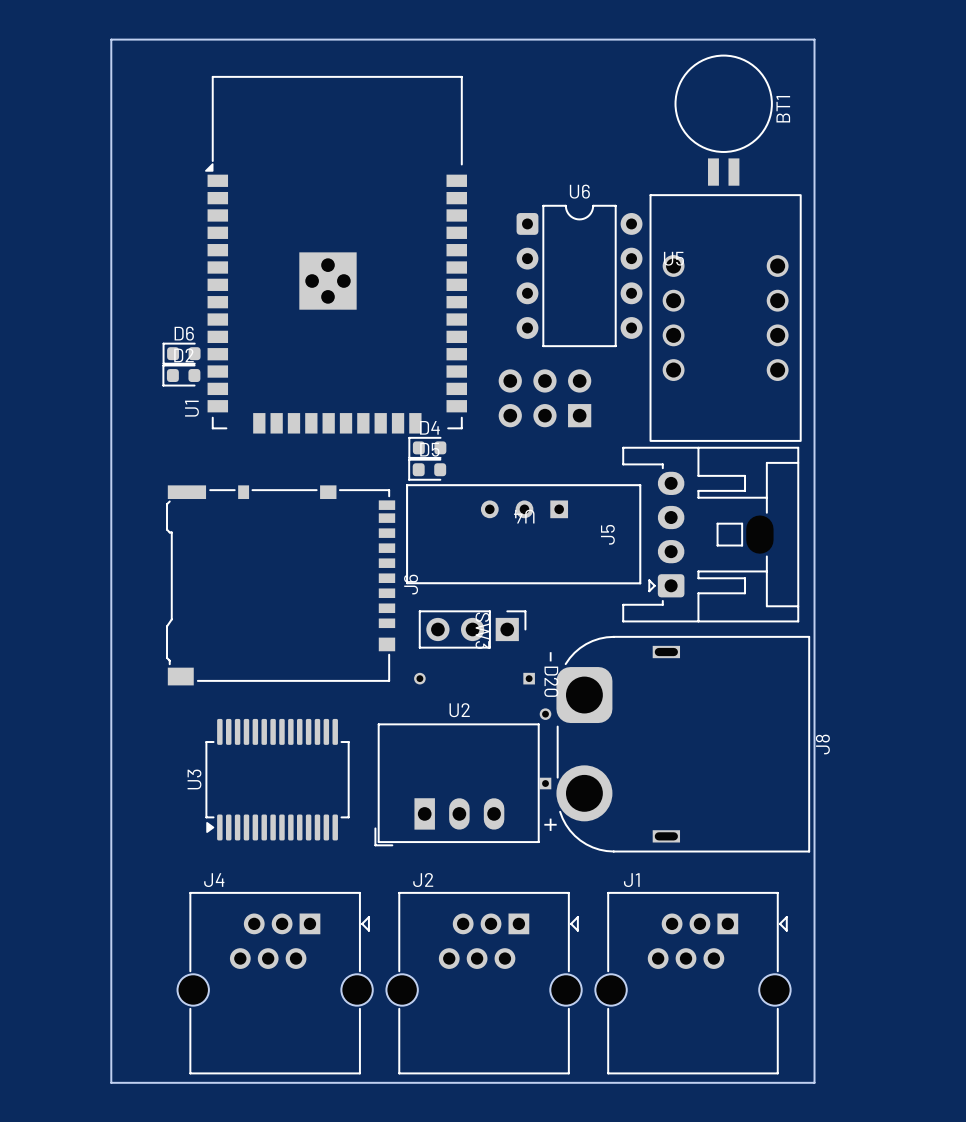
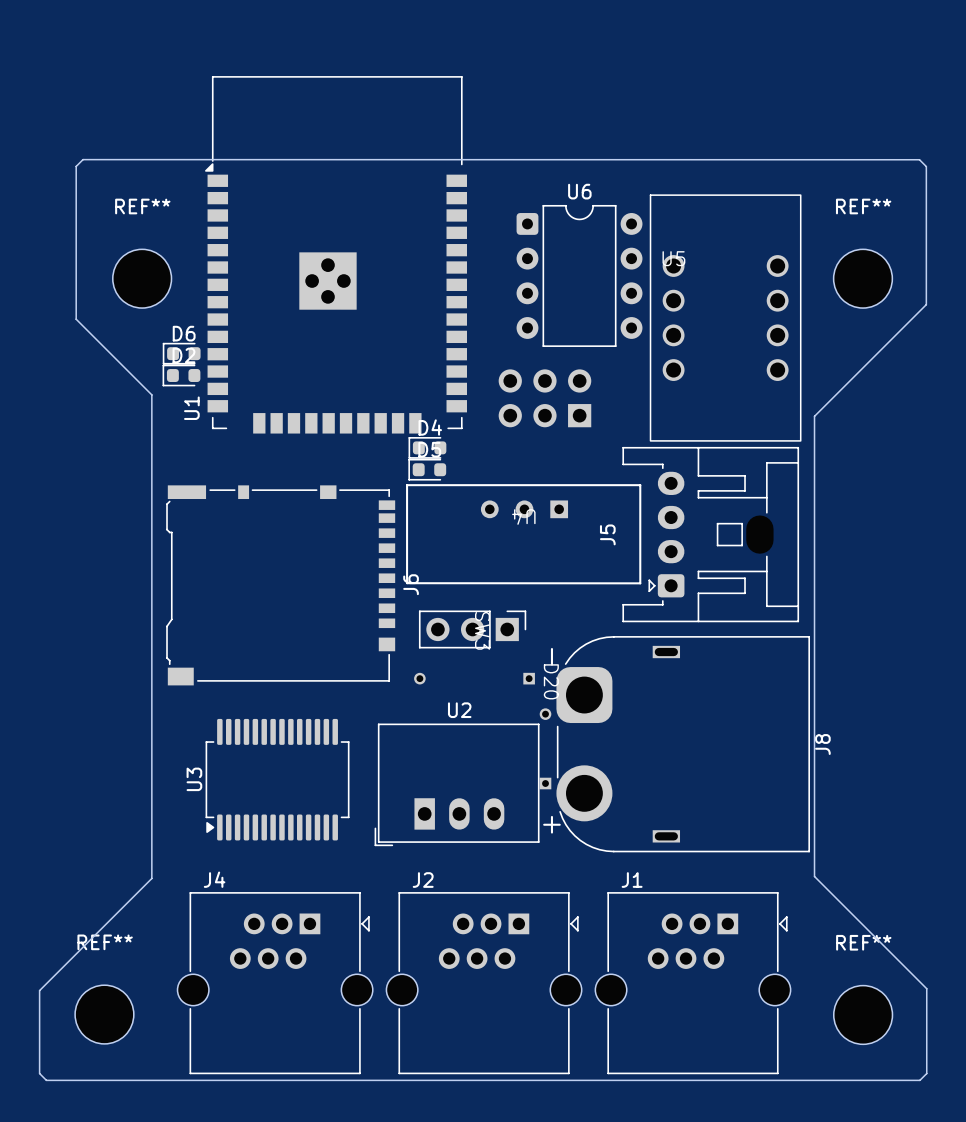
BT1: (723, 120) -> none
REF**: none -> (142, 278)
REF**: none -> (862, 278)
board edge: (814, 416) (814, 39) (111, 39) (111, 1082) (814, 1082) (814, 876) -> (814, 416) (926, 304) (926, 166) (919, 159) (83, 159) (76, 166) (76, 319) (151, 394) (151, 878) (39, 990) (39, 1073) (46, 1080) (919, 1080) (926, 1073) (926, 988) (814, 876)
REF**: none -> (104, 1014)
REF**: none -> (863, 1014)

